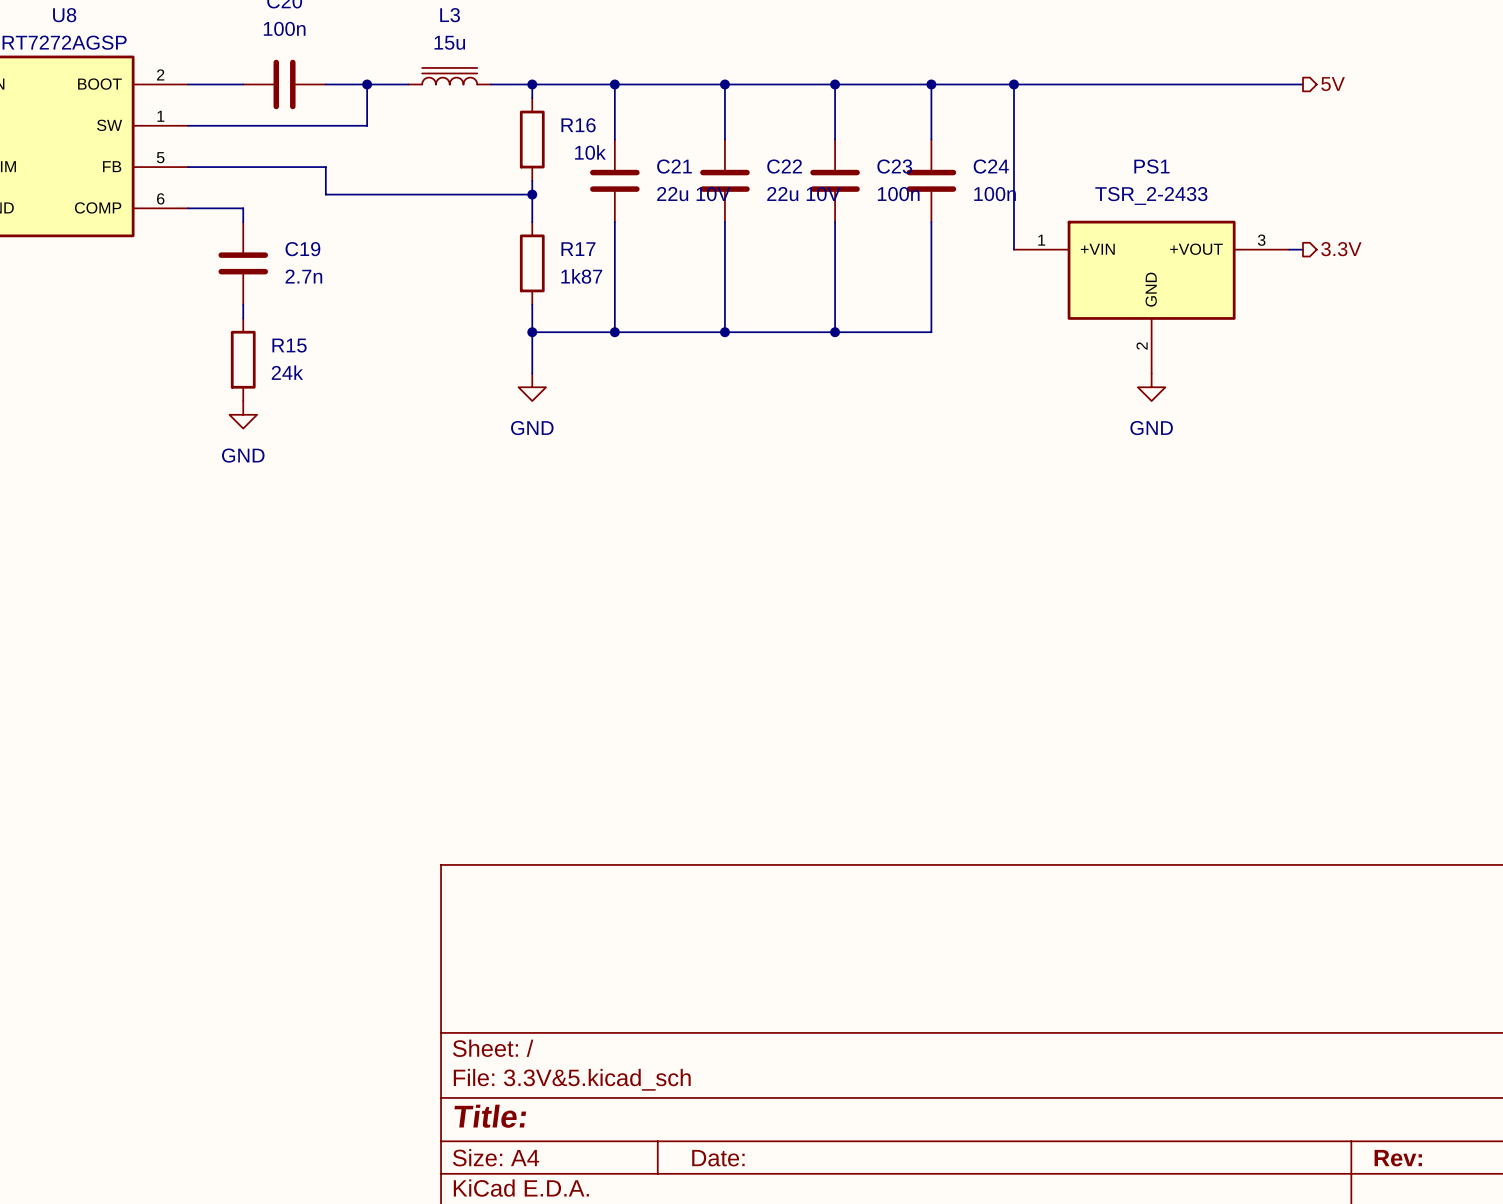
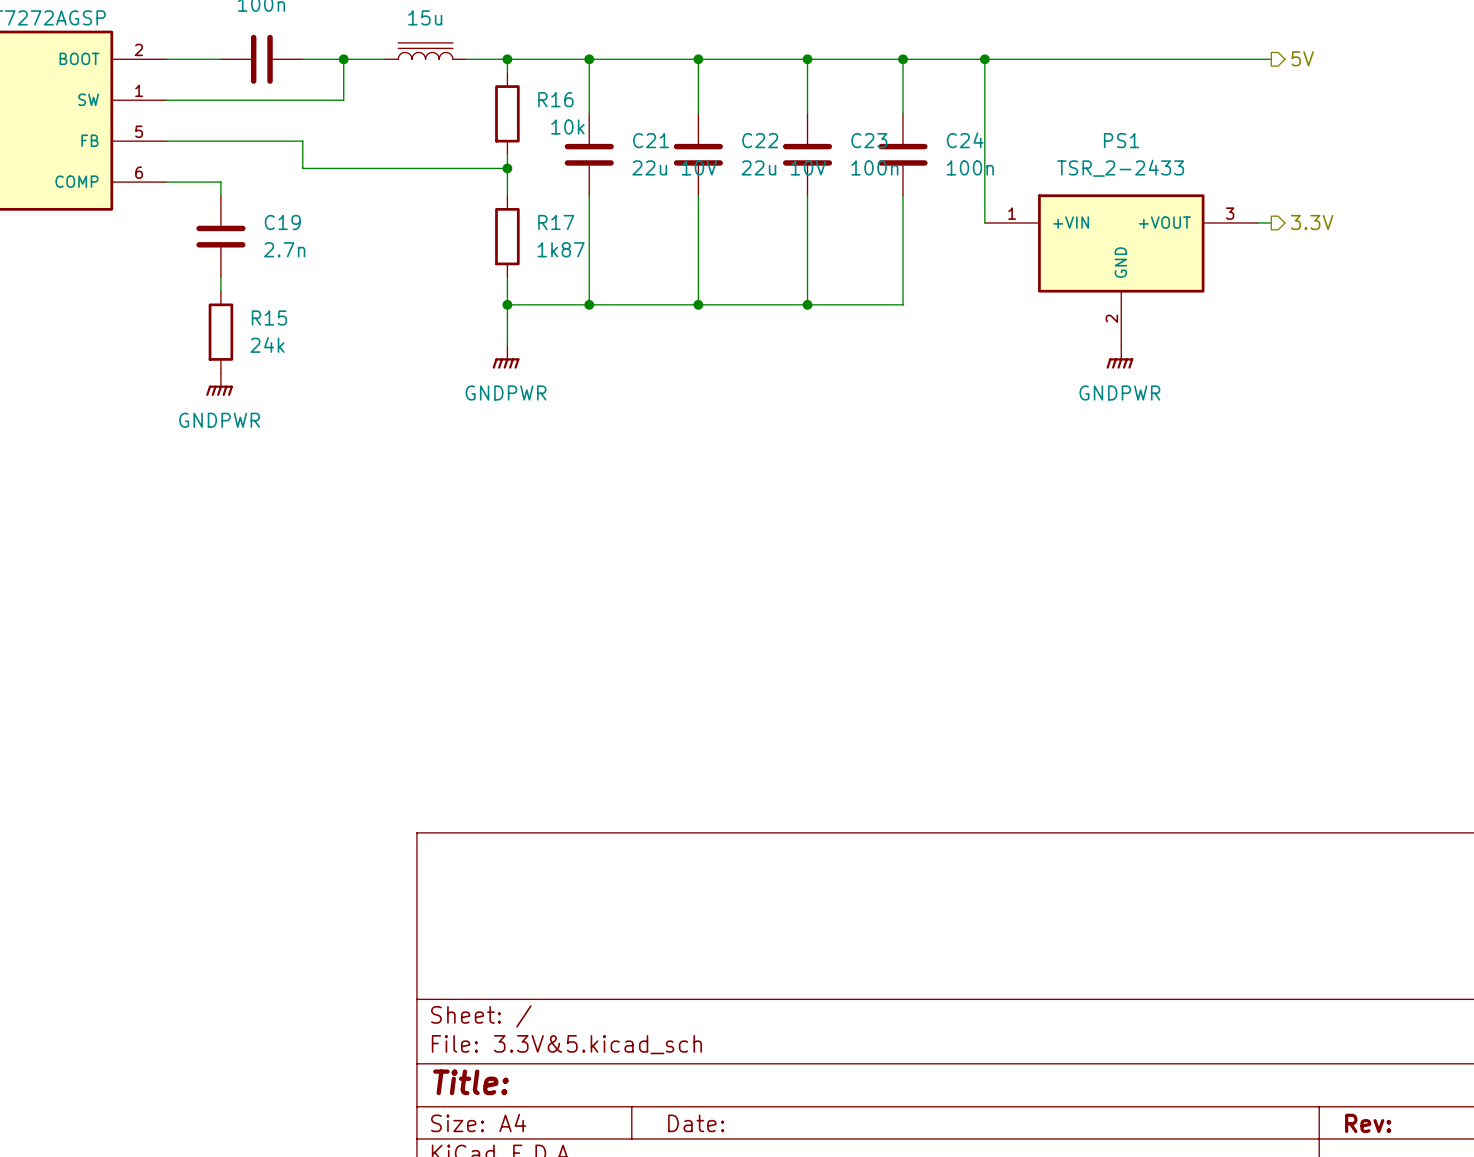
power symbol: GND (532, 387) -> GNDPWR (506, 357)
power symbol: GND (1151, 387) -> GNDPWR (1119, 357)
power symbol: GND (243, 414) -> GNDPWR (219, 384)

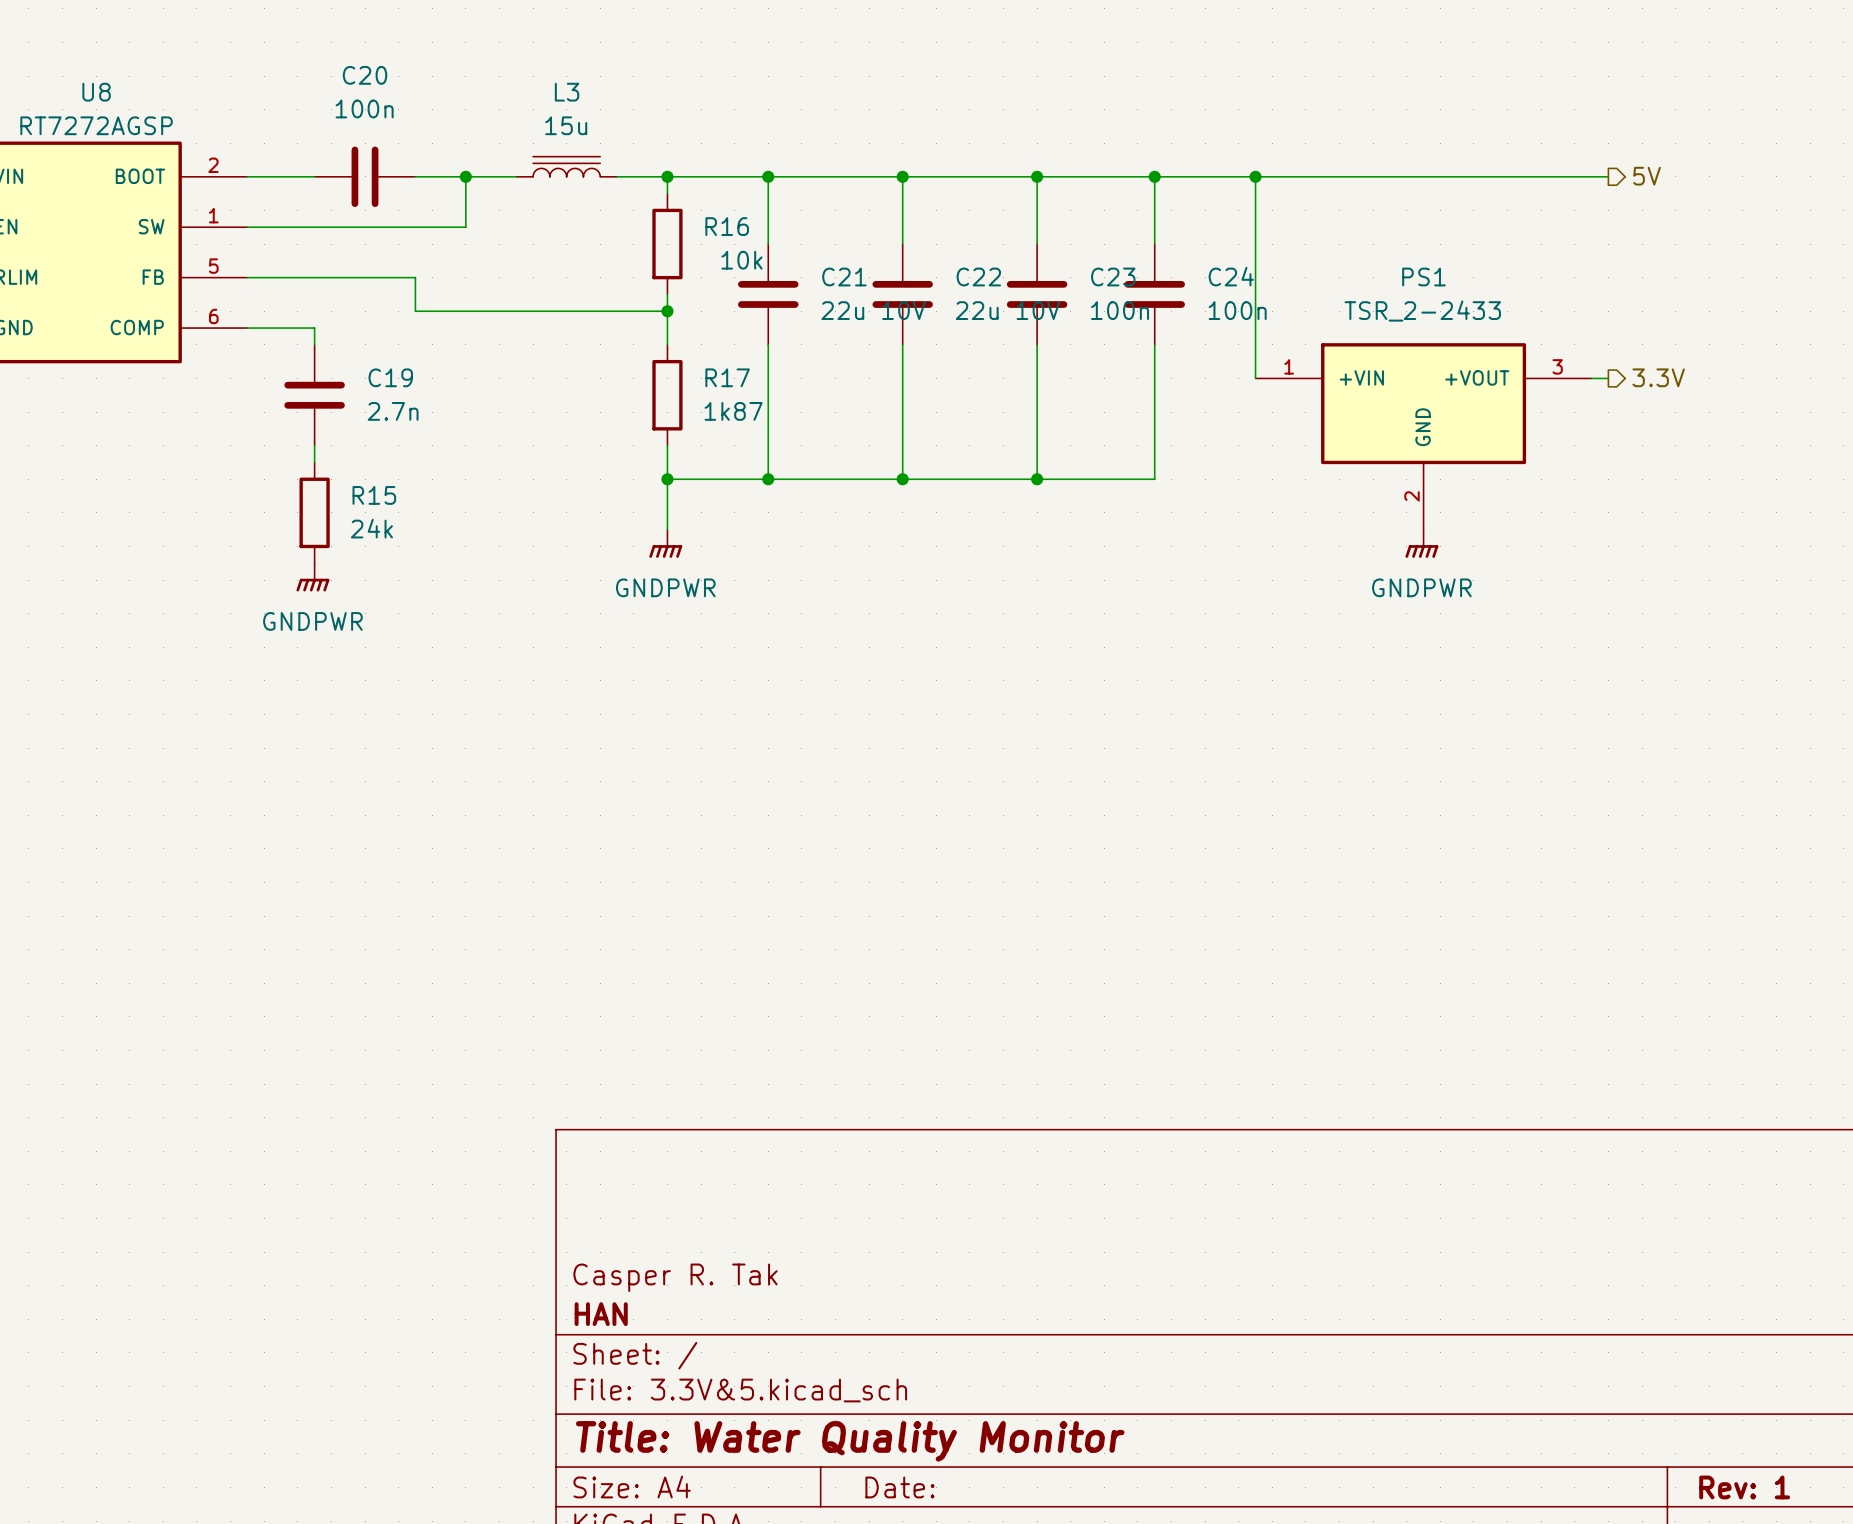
title block: none -> Casper R. Tak (675, 1277)
title block: none -> HAN (601, 1314)
title block: Title: (471, 1082) -> Title: Water Quality Monitor (850, 1441)
title block: Rev: (1368, 1123) -> Rev: 1 (1744, 1487)

